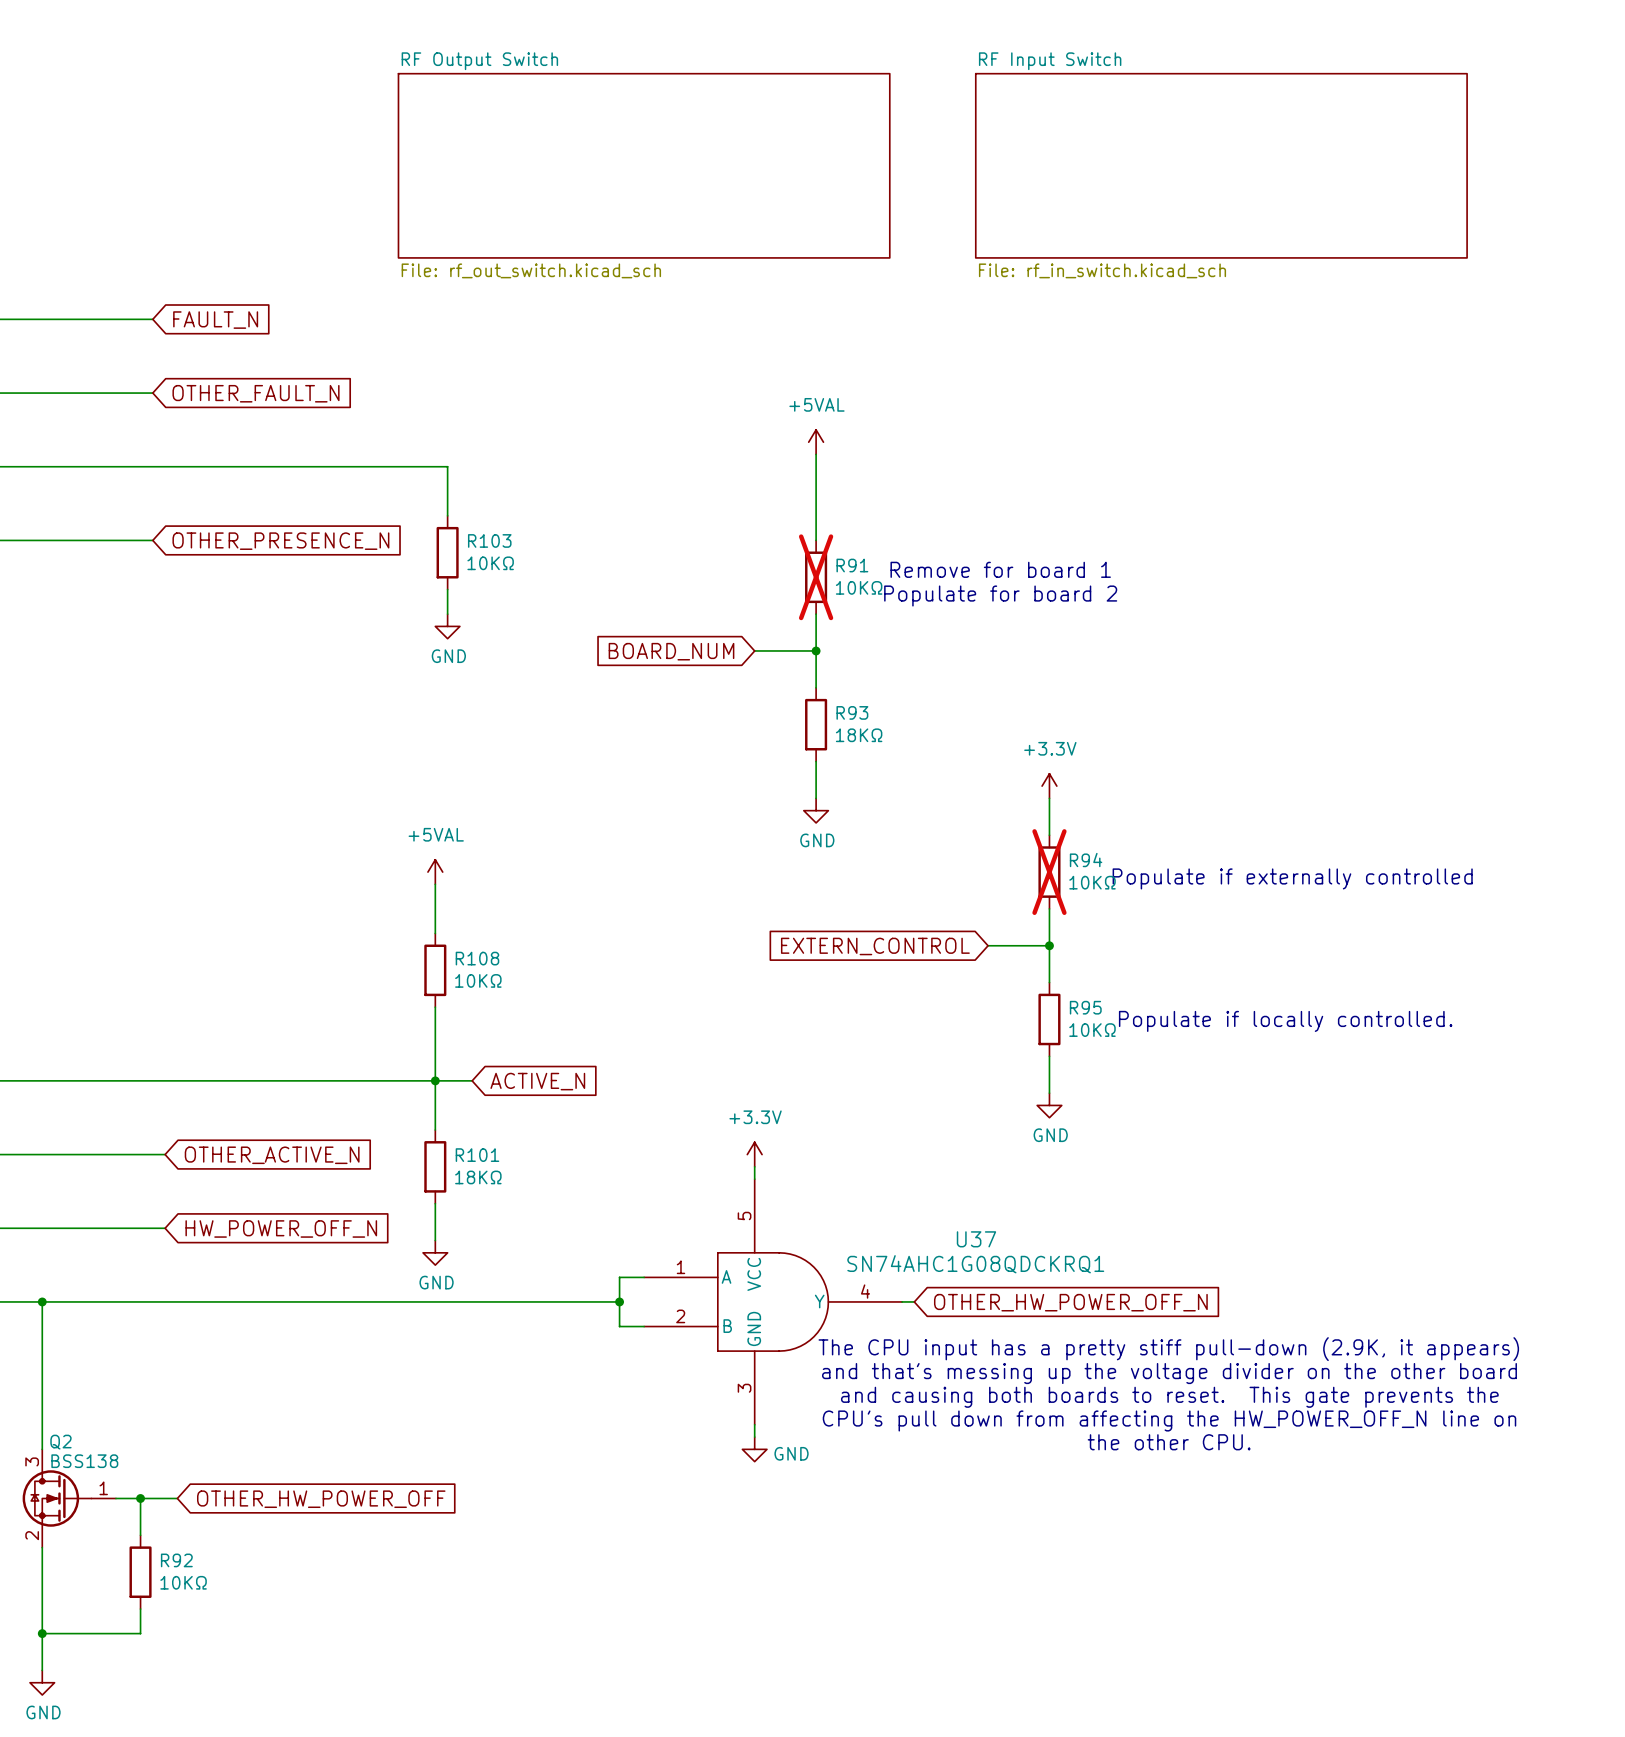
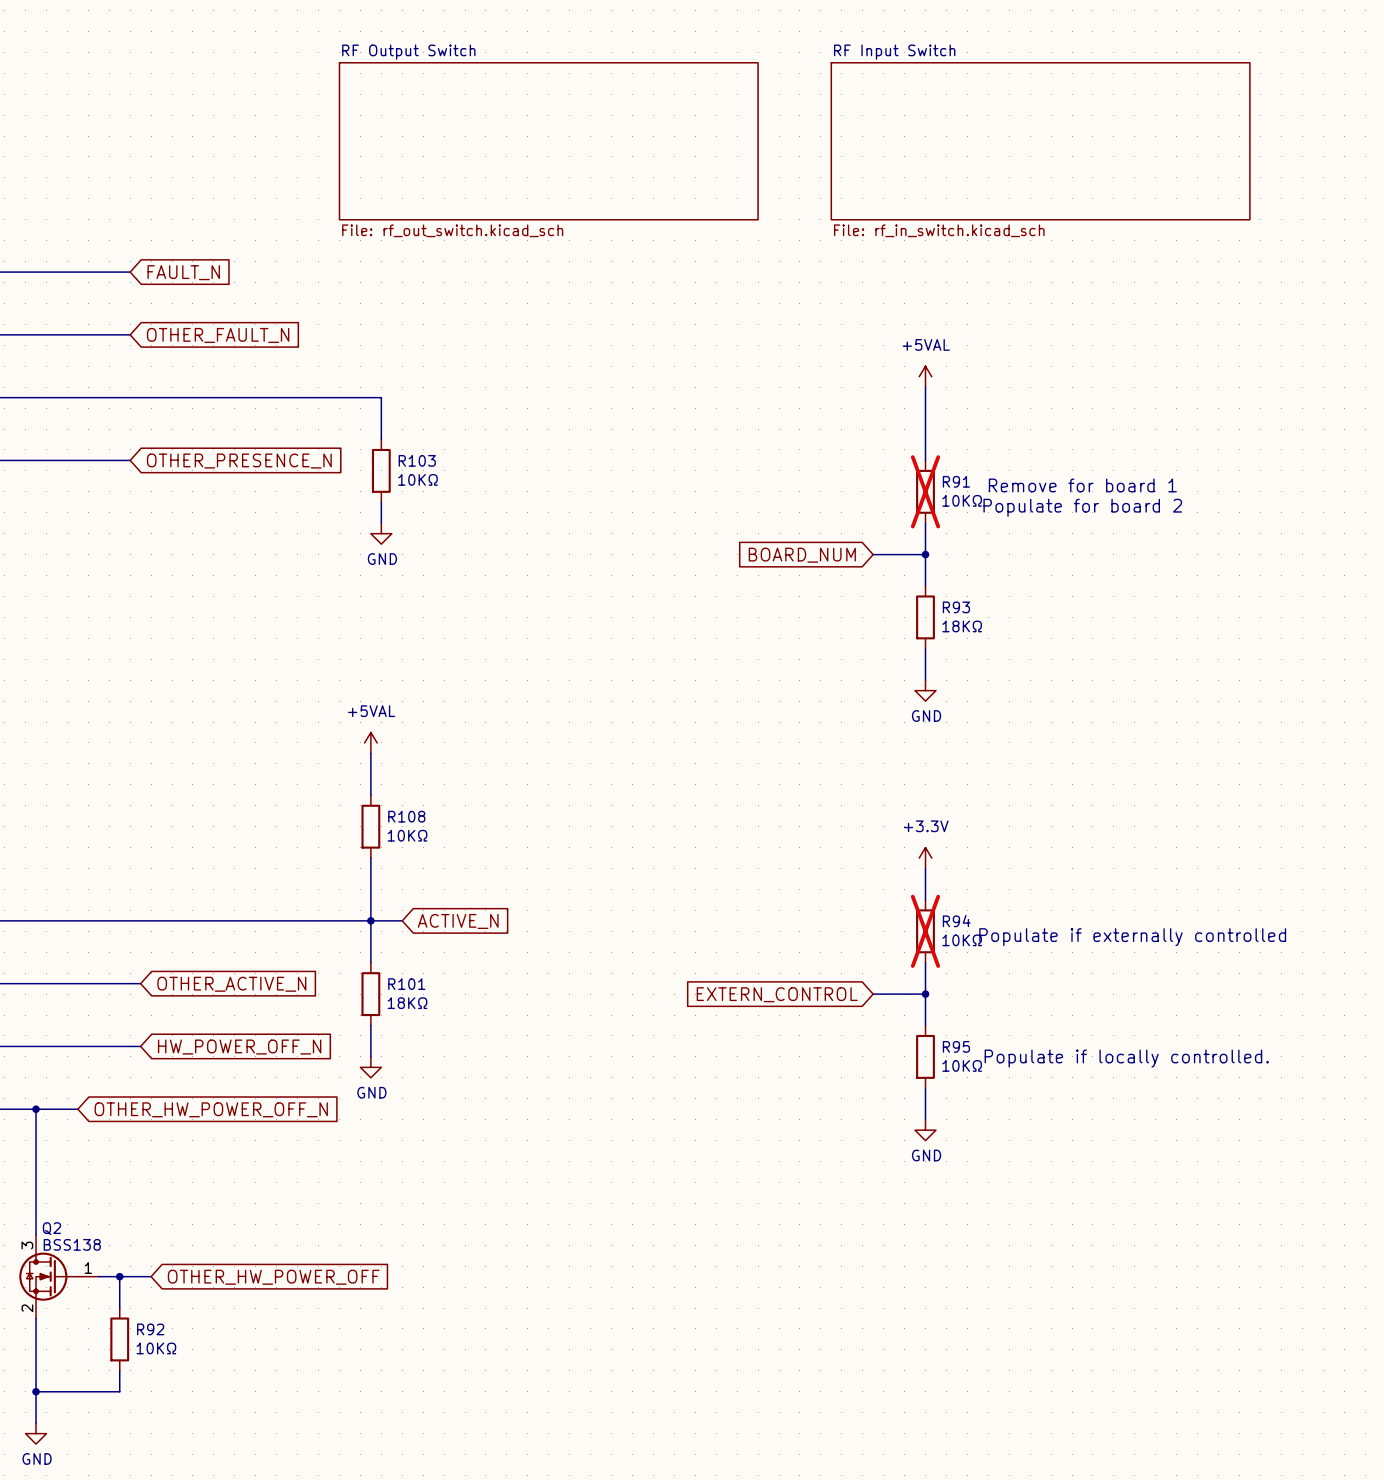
power symbol: +5VAL (816, 442) -> none
power symbol: none -> +5VAL (925, 376)
wire: (816, 454) (816, 540) -> none
wire: none -> (925, 387) (925, 460)
text: Remove for board 1 (1000, 569) -> none
text: none -> Remove for board 1 (1082, 485)
R91 position: (816, 577) -> (925, 491)
text: Populate for board 2 (1000, 596) -> none
text: none -> Populate for board 2 (1082, 507)
wire: (816, 614) (816, 687) -> none
wire: none -> (925, 523) (925, 586)
wire: (754, 650) (816, 650) -> none
junction: (816, 650) -> none
wire: none -> (873, 554) (925, 554)
junction: none -> (925, 554)
global label: BOARD_NUM (671, 651) -> none
global label: none -> BOARD_NUM (802, 555)
R93 position: (816, 724) -> (925, 617)
wire: (816, 761) (816, 798) -> none
wire: none -> (925, 648) (925, 680)
power symbol: +3.3V (1049, 786) -> none
wire: (1049, 798) (1049, 835) -> (925, 868) (925, 899)
power symbol: GND (816, 810) -> none
power symbol: none -> GND (925, 690)
R94 position: (1049, 872) -> (925, 931)
text position: Populate if externally controlled (1292, 878) -> Populate if externally controlled (1132, 937)
wire: (1049, 908) (1049, 982) -> (925, 962) (925, 1025)
wire: (988, 945) (1049, 945) -> (873, 994) (925, 994)
junction: (1049, 945) -> none
global label position: EXTERN_CONTROL (875, 946) -> EXTERN_CONTROL (777, 994)
power symbol: none -> +3.3V (925, 858)
R95 position: (1049, 1019) -> (925, 1056)
text position: Populate if locally controlled. (1285, 1021) -> Populate if locally controlled. (1126, 1058)
wire: (1049, 1056) (1049, 1093) -> (925, 1088) (925, 1119)
power symbol: GND (1049, 1105) -> none
power symbol: +3.3V (754, 1154) -> none
wire: (754, 1166) (754, 1179) -> none
junction: none -> (925, 994)
wire: (644, 1277) (619, 1277) (619, 1326) (644, 1326) -> none
wire: (91, 1301) (619, 1301) -> none
junction: (619, 1301) -> none
U37: SN74AHC1G08QDCKRQ1 (773, 1301) -> none
wire: (902, 1301) (914, 1301) -> none
global label: none -> OTHER_HW_POWER_OFF_N (211, 1109)
global label: OTHER_HW_POWER_OFF_N (1070, 1302) -> none
power symbol: none -> GND (925, 1130)
text: The CPU input has a pretty stiff pull-down (2.9K, it appears) (1168, 1349) -> none
text: and that's messing up the voltage divider on the other board (1169, 1373) -> none
text: and causing both boards to reset. This gate prevents the (1169, 1397) -> none
text: CPU's pull down from affecting the HW_POWER_OFF_N line on (1169, 1420) -> none
wire: (754, 1424) (754, 1437) -> none
text: the other CPU. (1169, 1442) -> none
power symbol: GND (754, 1449) -> none

